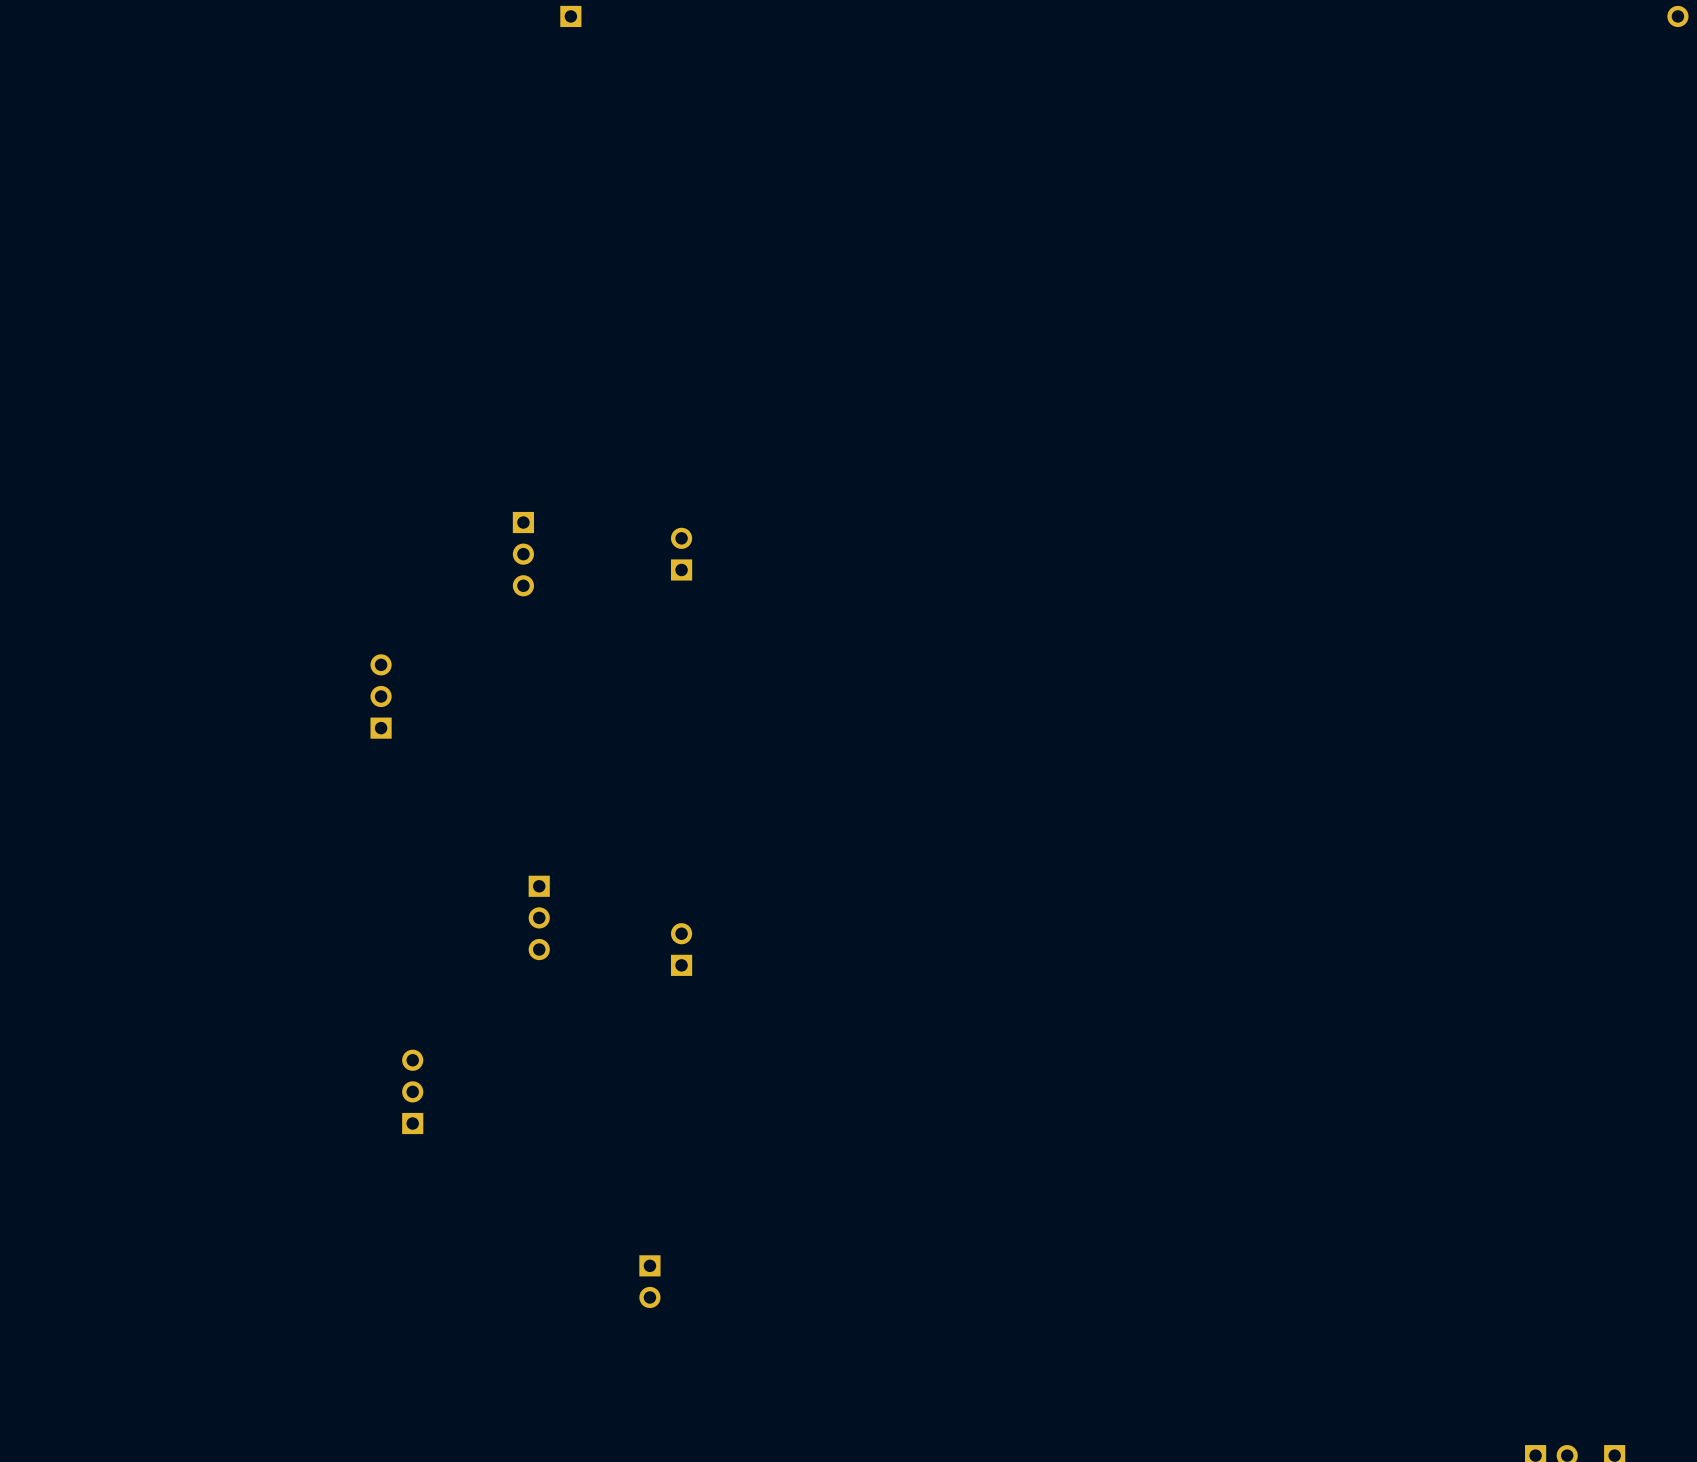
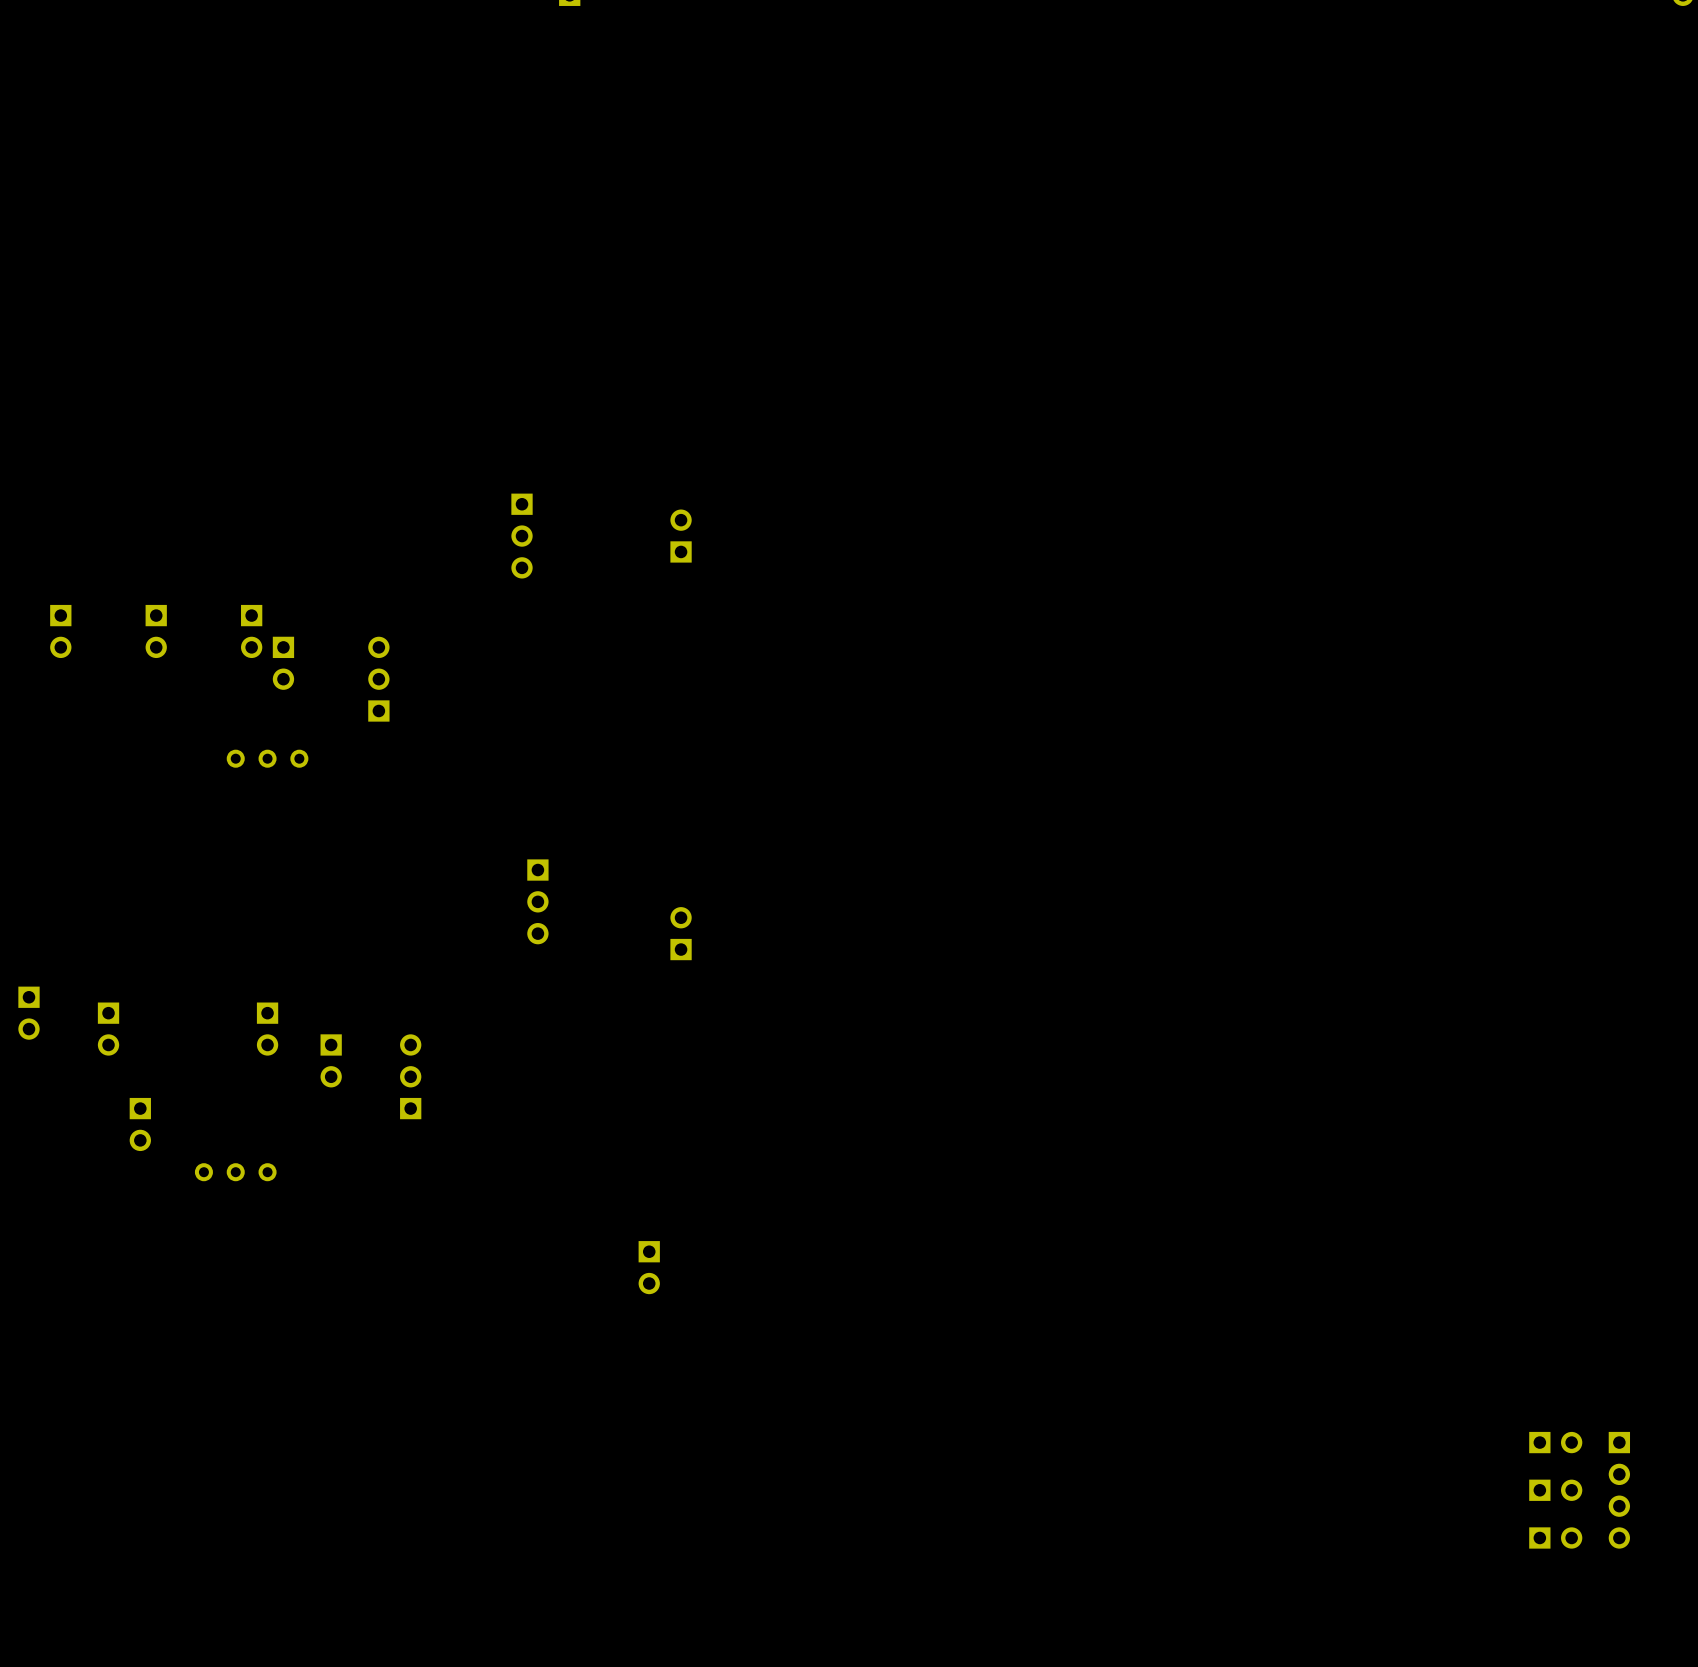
part: none -> (60, 631)
part: none -> (156, 631)
part: none -> (251, 631)
part: none -> (283, 663)
part: none -> (267, 758)
part: none -> (29, 1013)
part: none -> (108, 1029)
part: none -> (267, 1029)
part: none -> (331, 1060)
part: none -> (140, 1124)
part: none -> (235, 1172)

